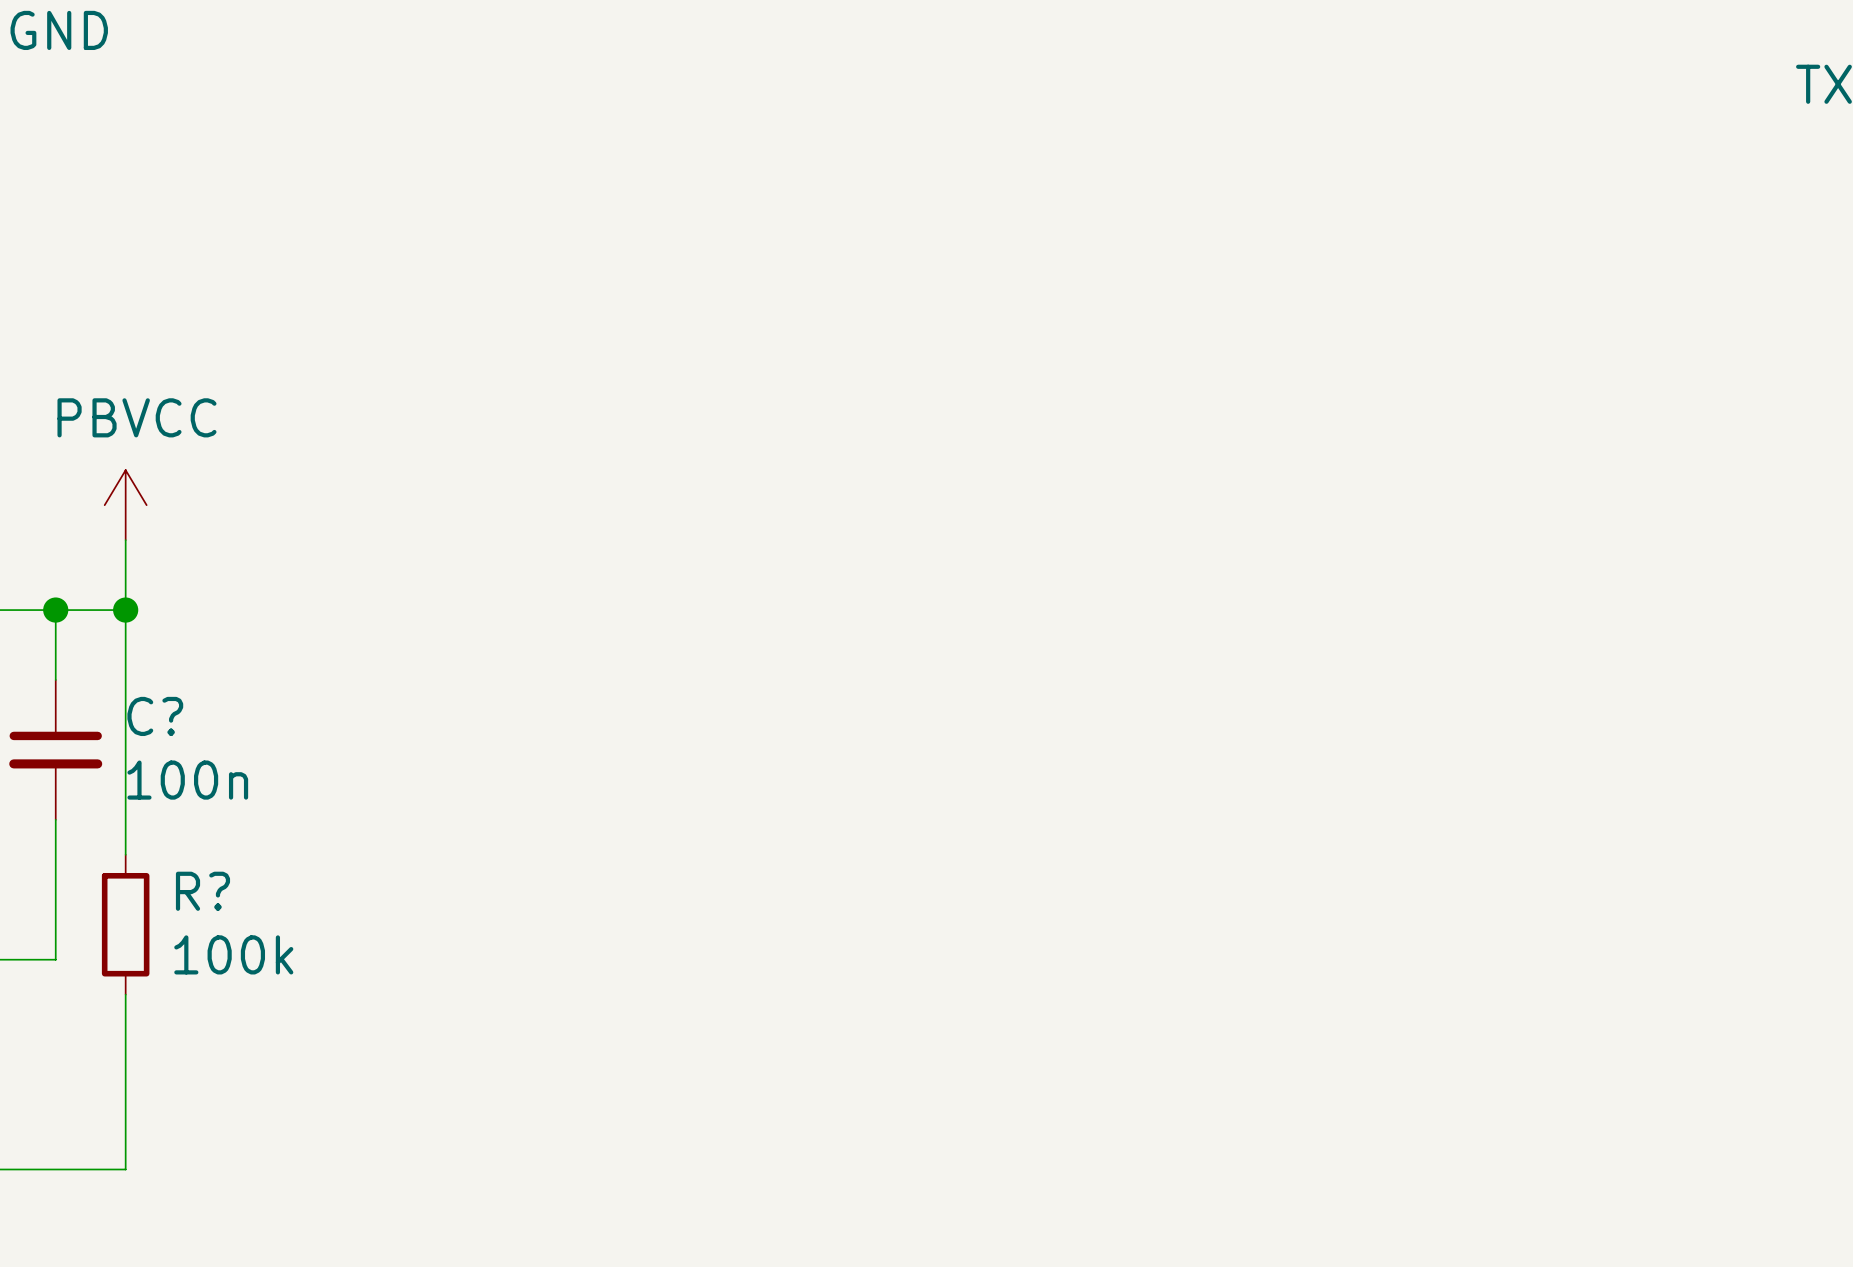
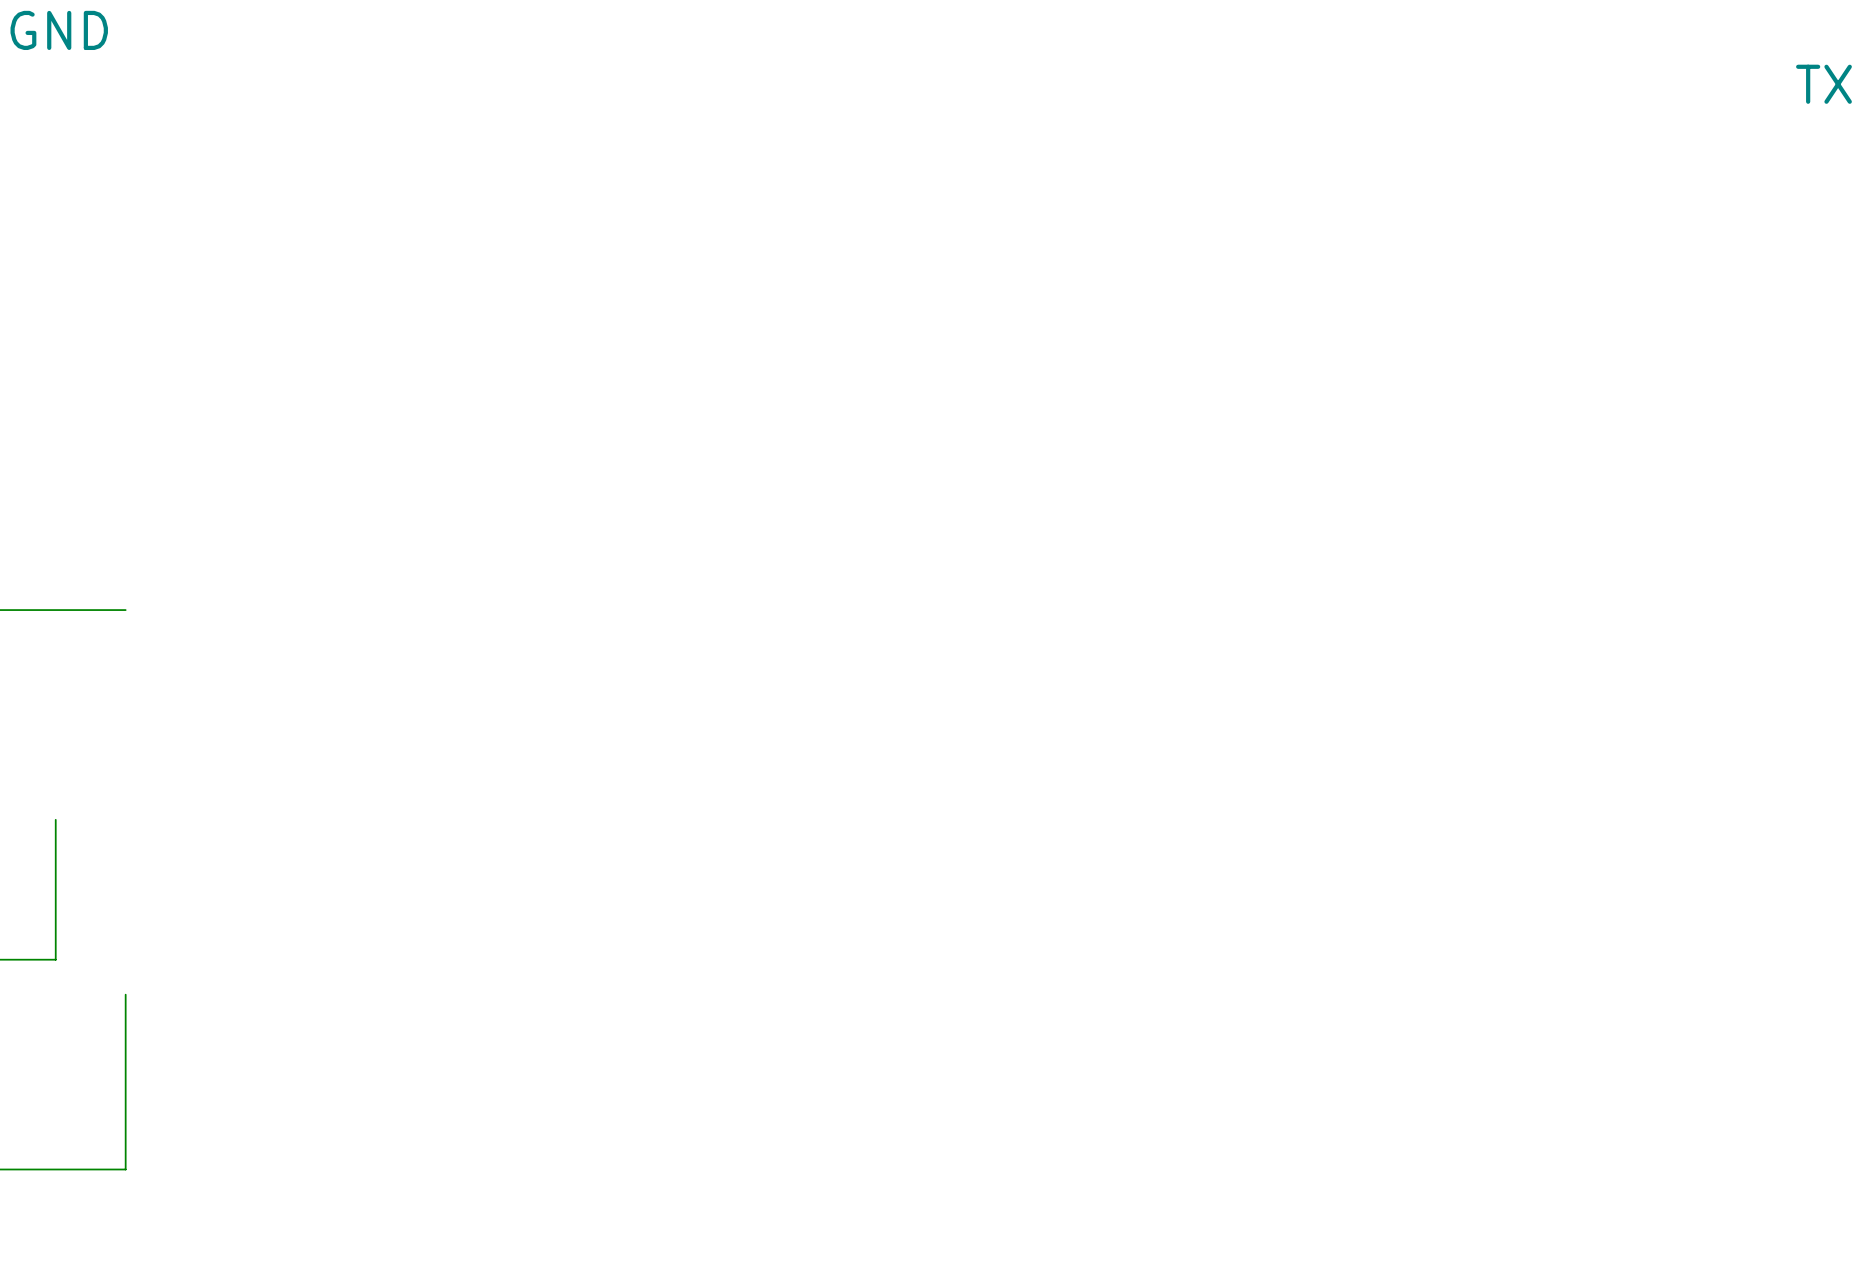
power symbol: PBVCC (125, 505) -> none
wire: (125, 540) (125, 854) -> none
wire: (55, 610) (55, 679) -> none
junction: (55, 610) -> none
junction: (125, 610) -> none
C?: 100n (55, 749) -> none
R?: 100k (125, 924) -> none

